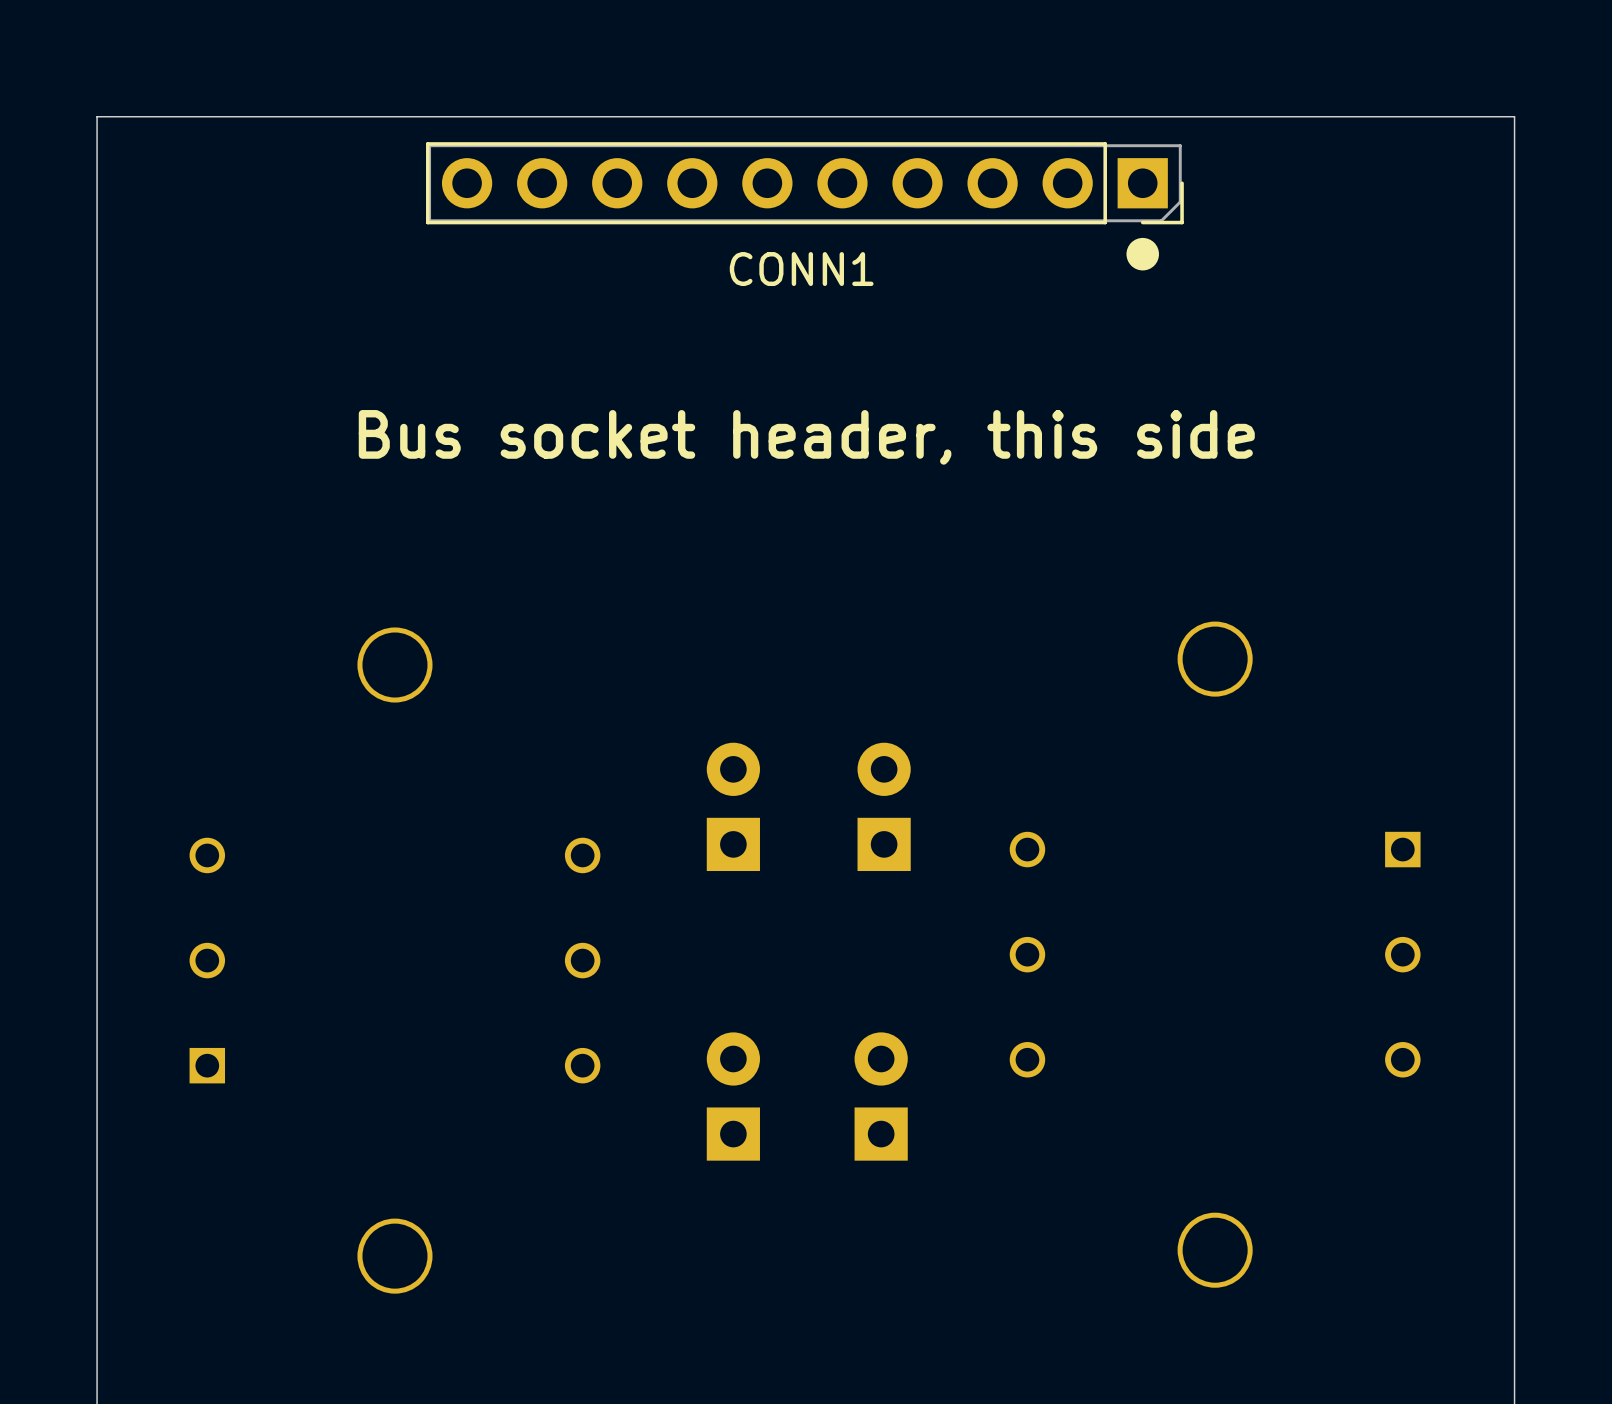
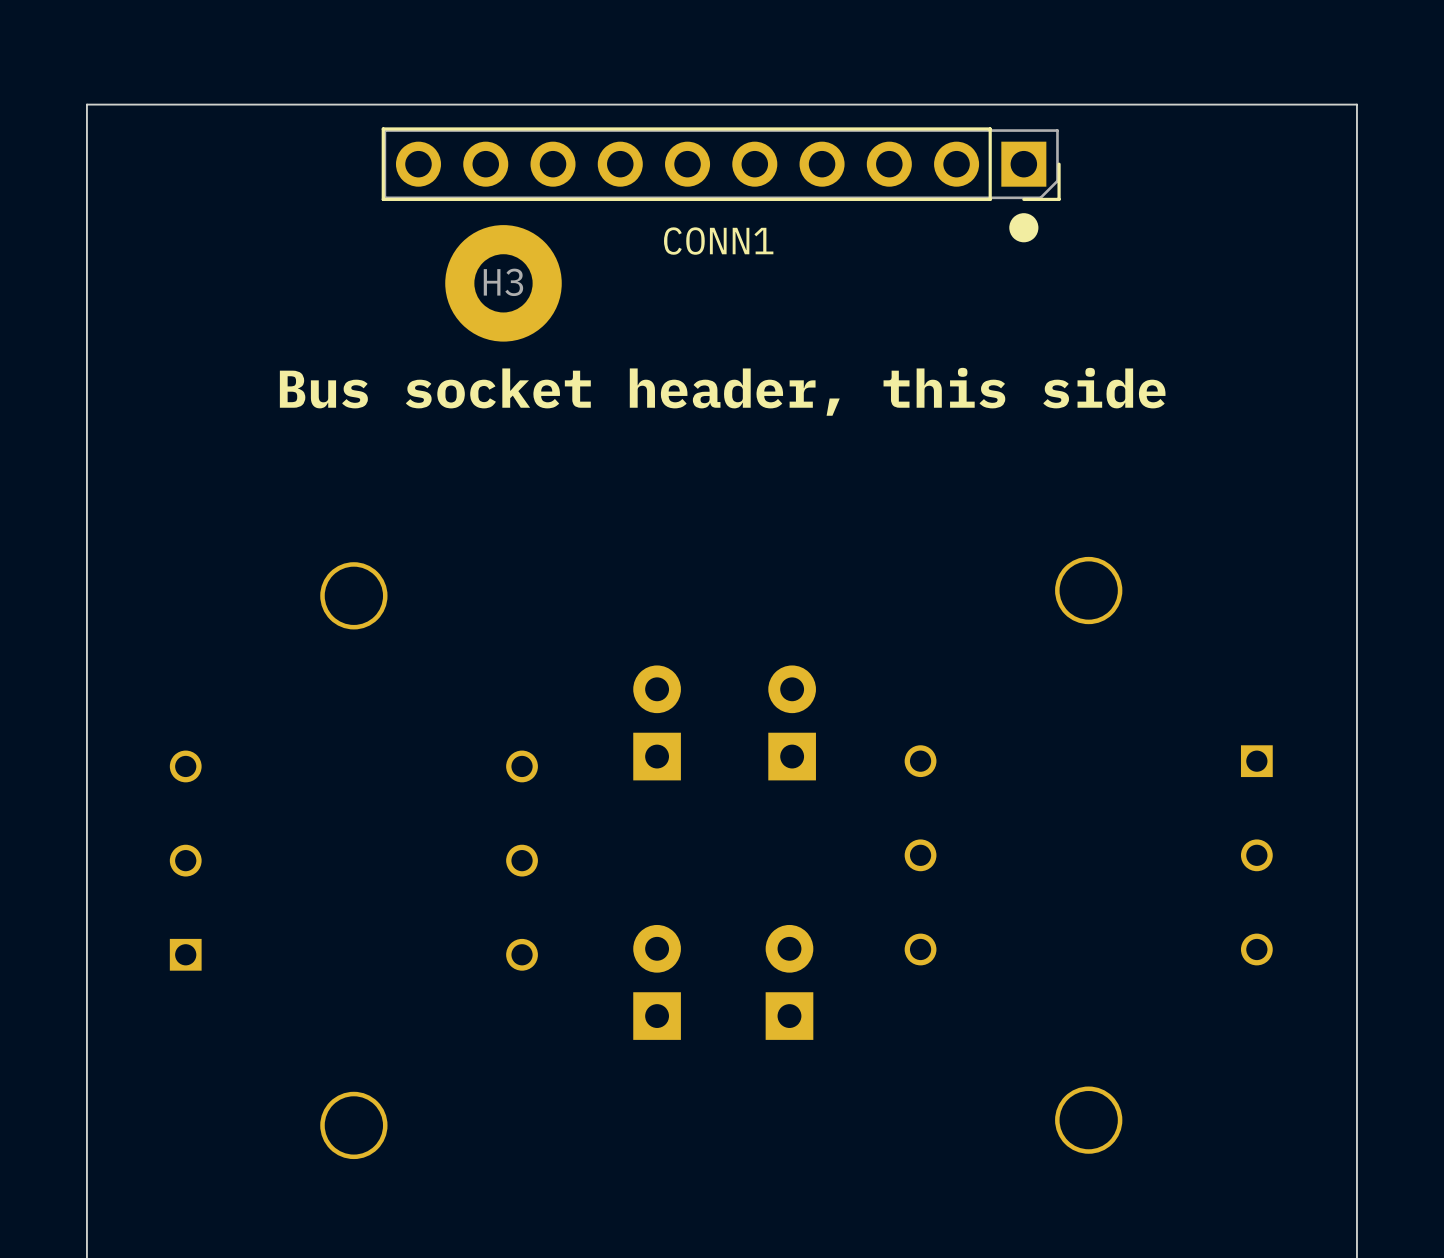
H3: none -> (503, 283)

